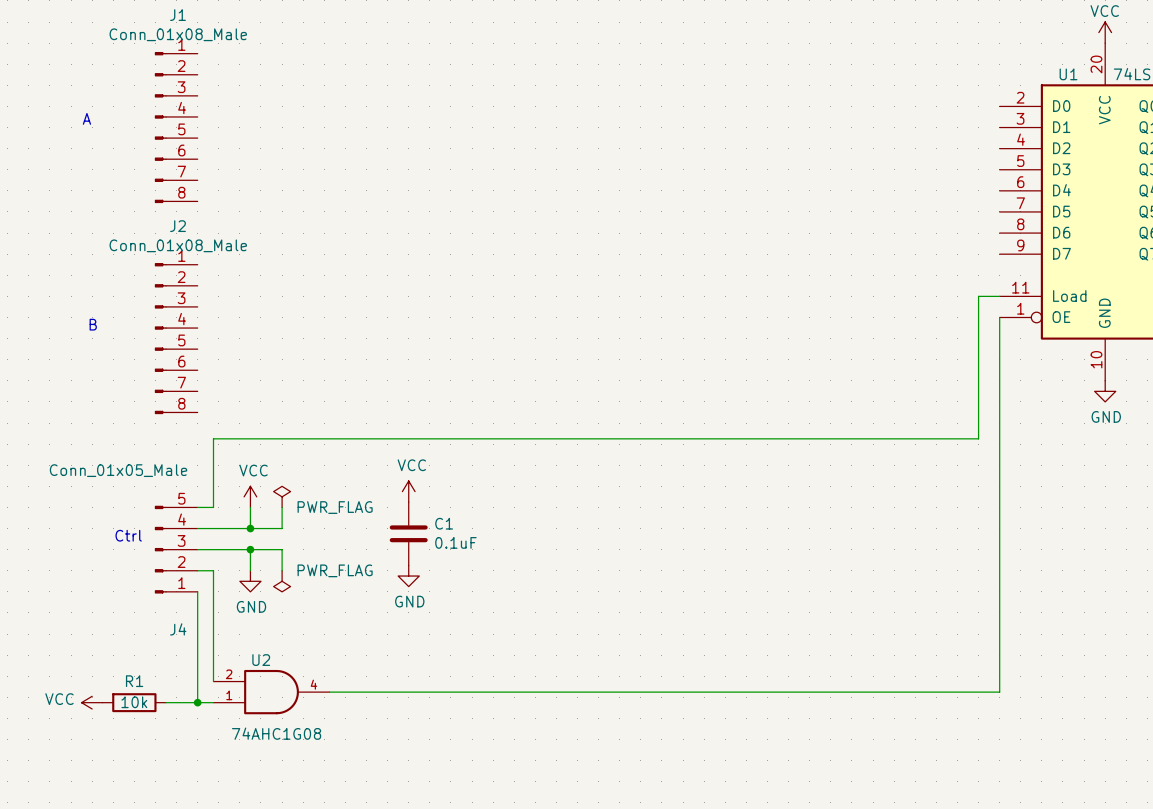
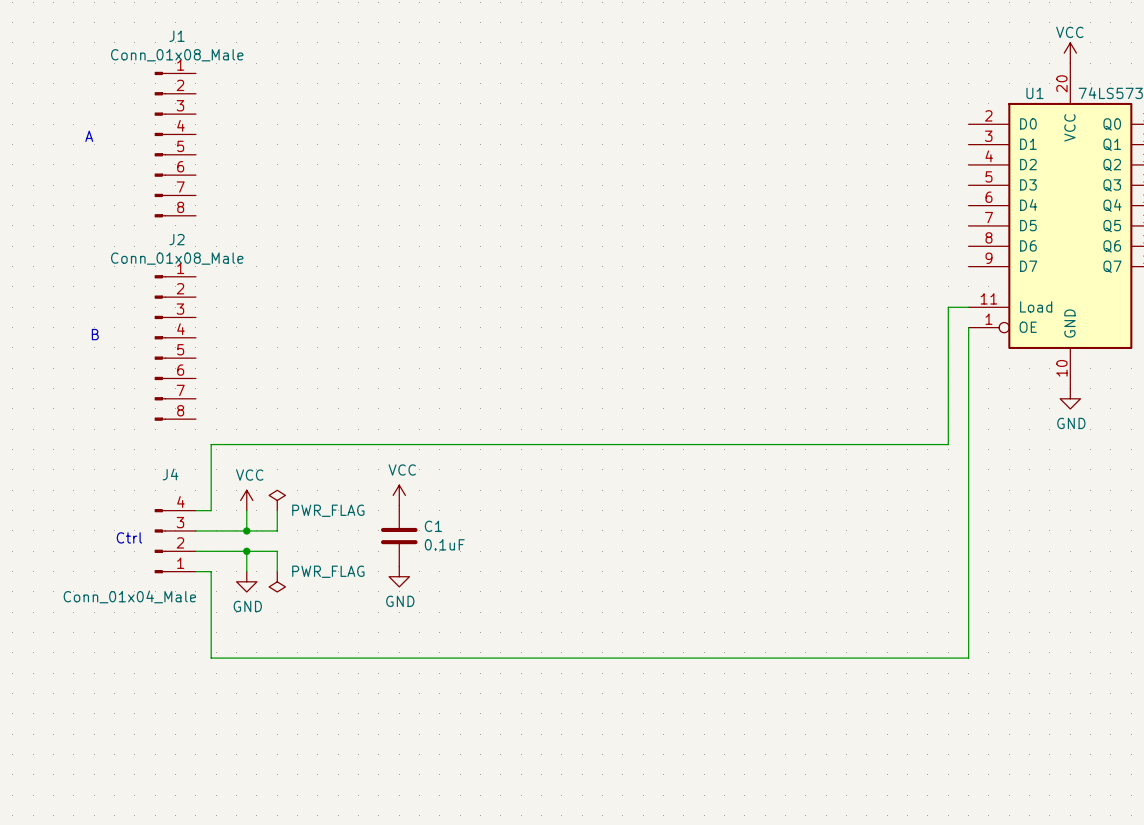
J4 value: Conn_01x05_Male (118, 470) -> Conn_01x04_Male (129, 596)
J4 symbol: [154, 505, 198, 594] -> [154, 509, 196, 574]
wire: (197, 591) (197, 702) -> none
J4 name position: J4 (178, 629) -> J4 (170, 474)
wire: (213, 660) (213, 681) -> none
wire: (999, 660) (999, 692) (329, 692) -> (968, 658) (211, 658)
U2: 74AHC1G08 (271, 692) -> none
power symbol: VCC (92, 702) -> none
R1: 10k (134, 702) -> none
wire: (166, 702) (213, 702) -> none
junction: (197, 702) -> none

